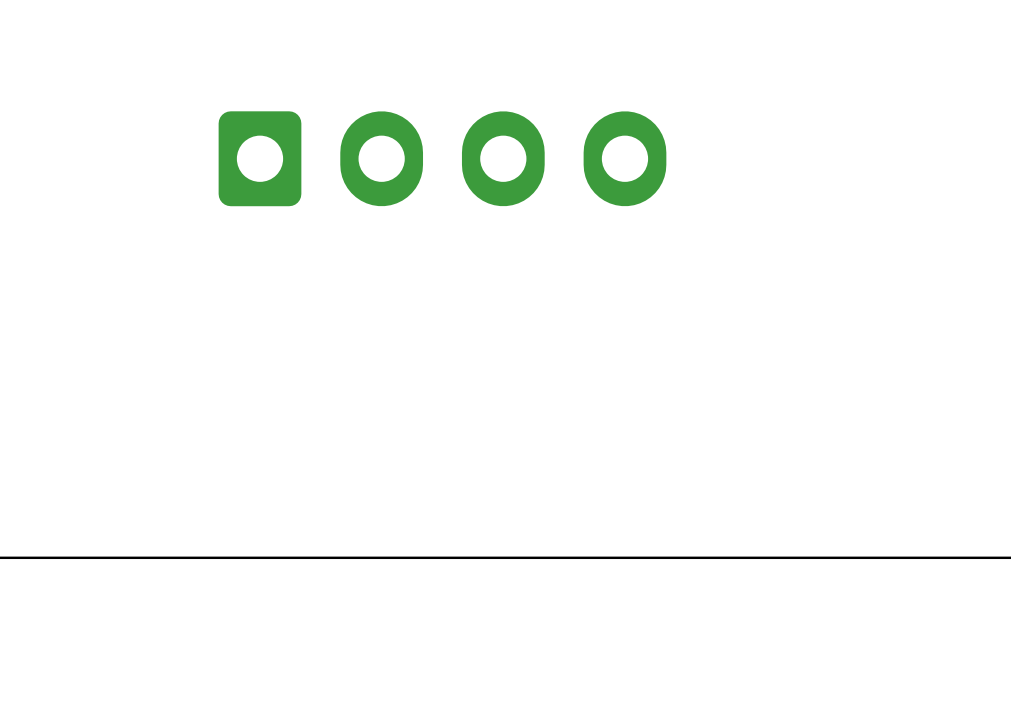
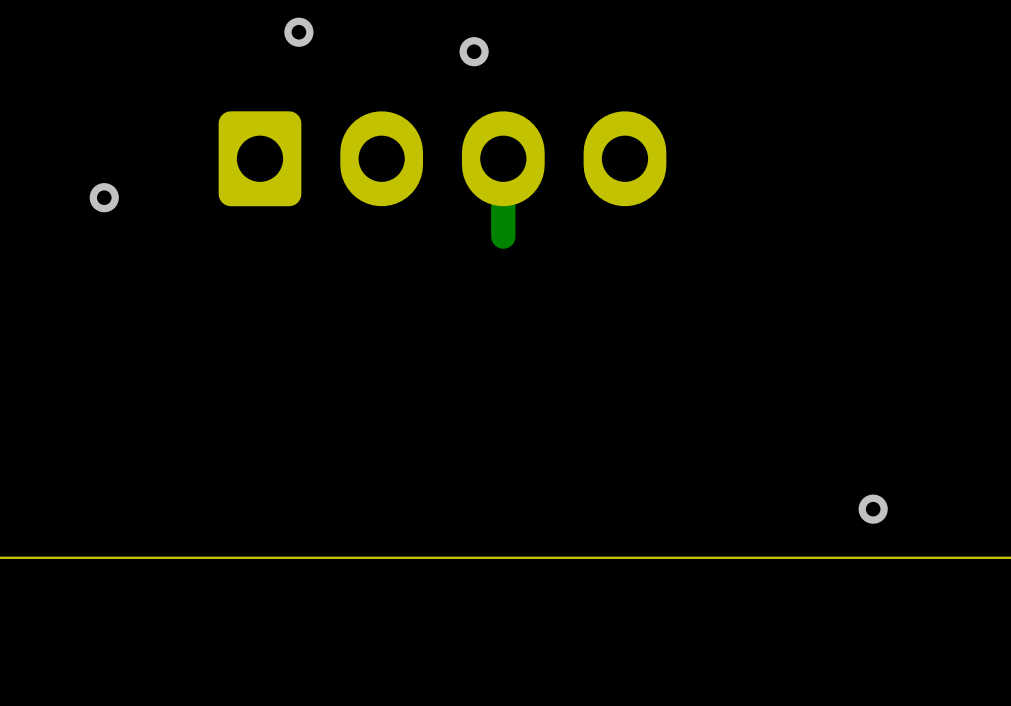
via: none -> (298, 32)
via: none -> (474, 51)
track: none -> (503, 158) (503, 236)
via: none -> (104, 197)
via: none -> (873, 509)

